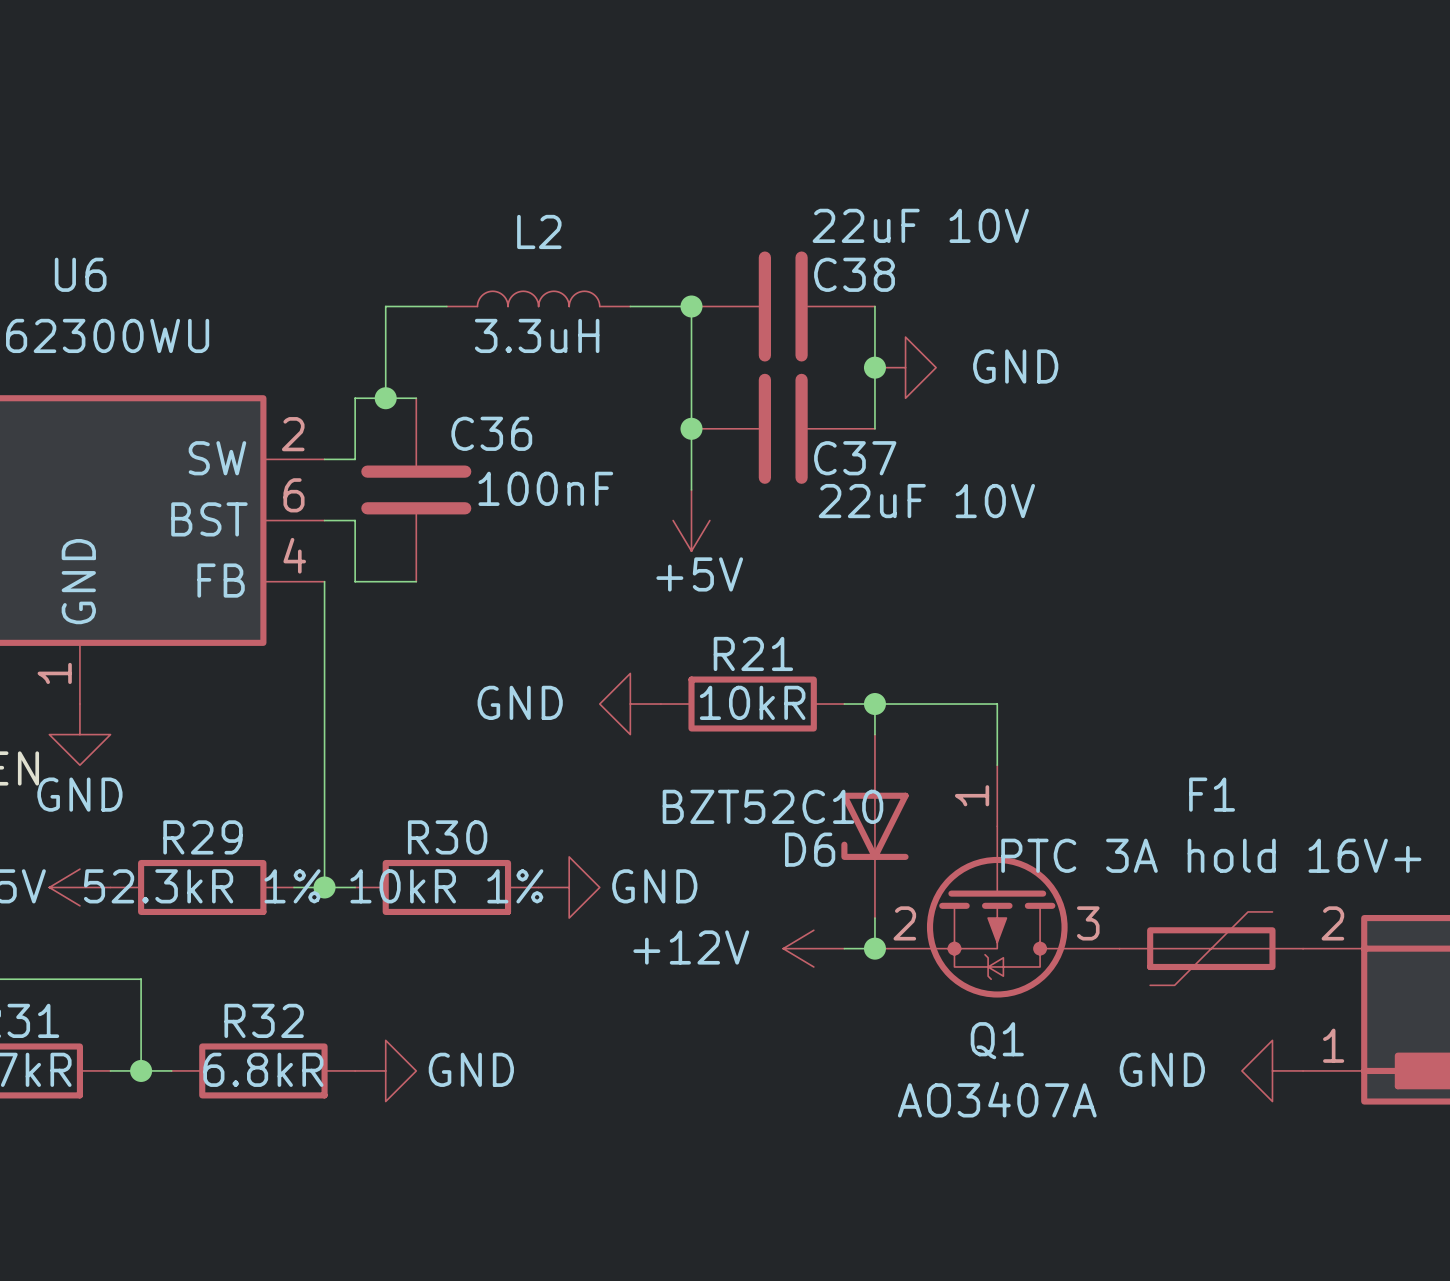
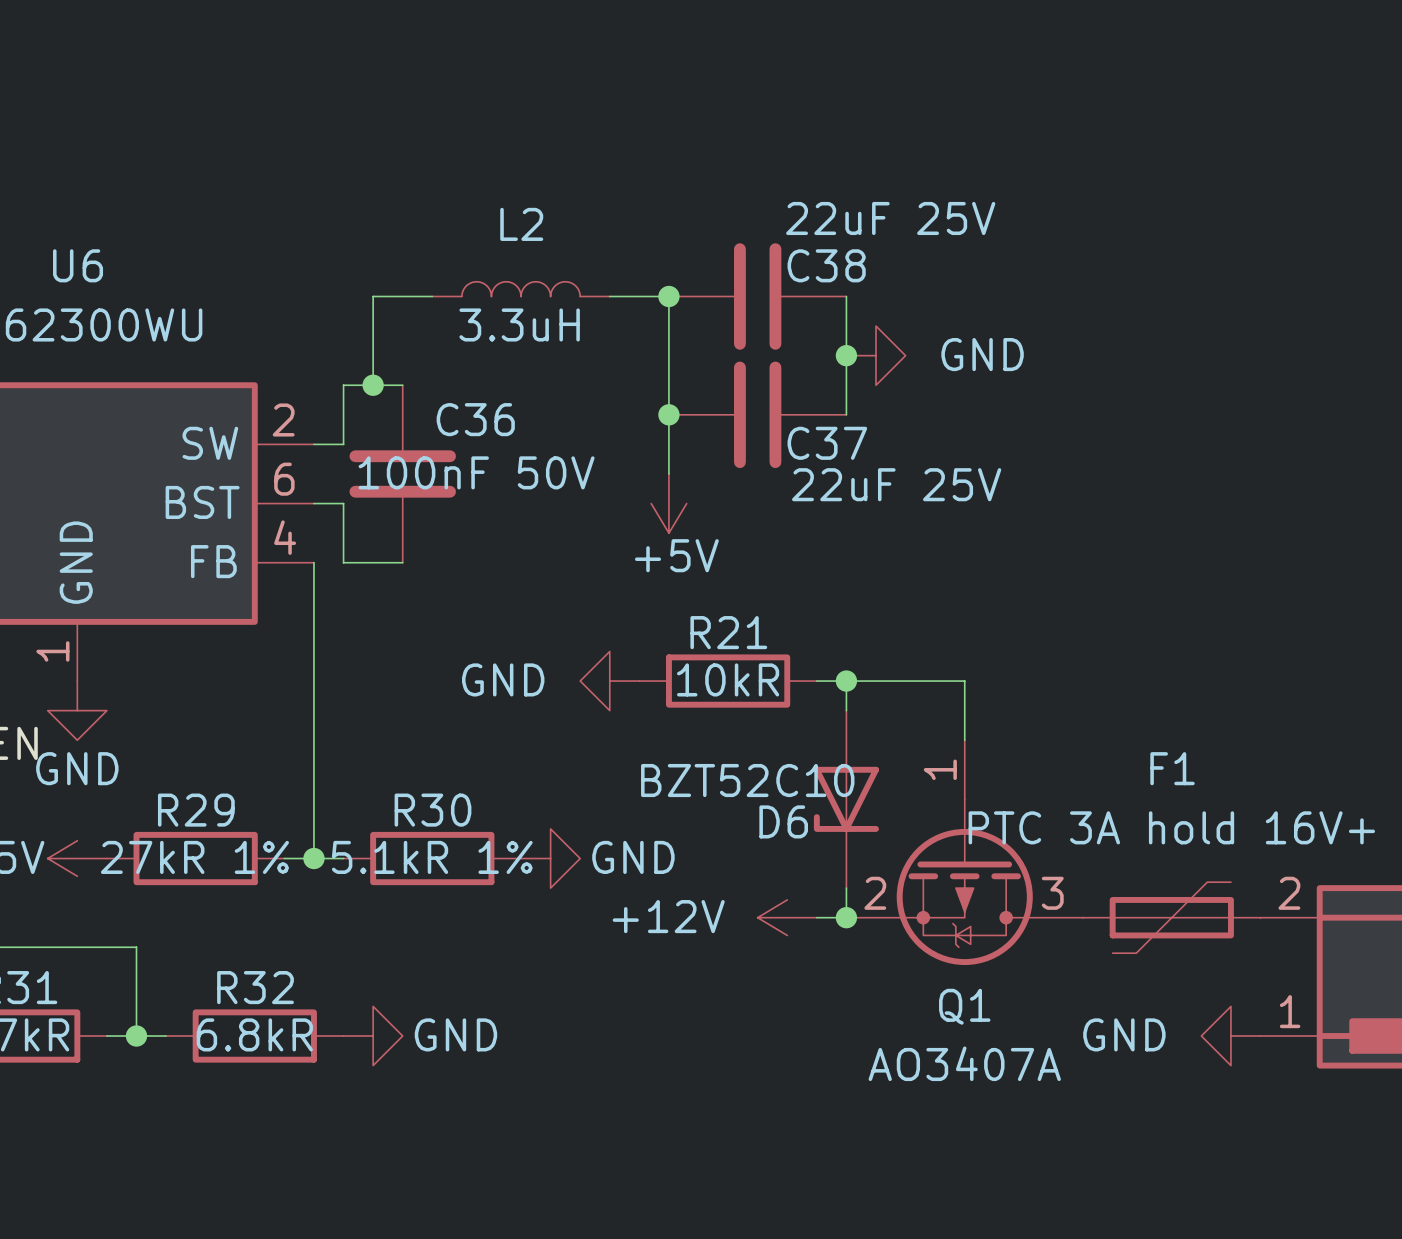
C38 value: 22uF 10V (920, 225) -> 22uF 25V (890, 218)
C36 value: 100nF (545, 488) -> 100nF 50V (476, 472)
C37 value: 22uF 10V (926, 501) -> 22uF 25V (896, 484)
R29 value: 52.3kR 1% (202, 886) -> 27kR 1% (194, 857)
R30 value: 10kR 1% (446, 886) -> 5.1kR 1% (432, 857)

